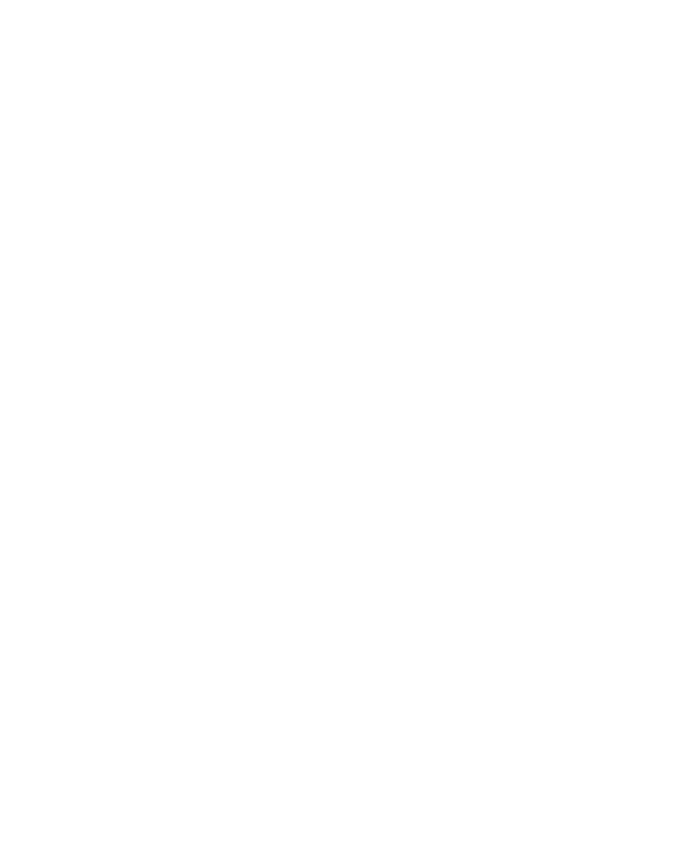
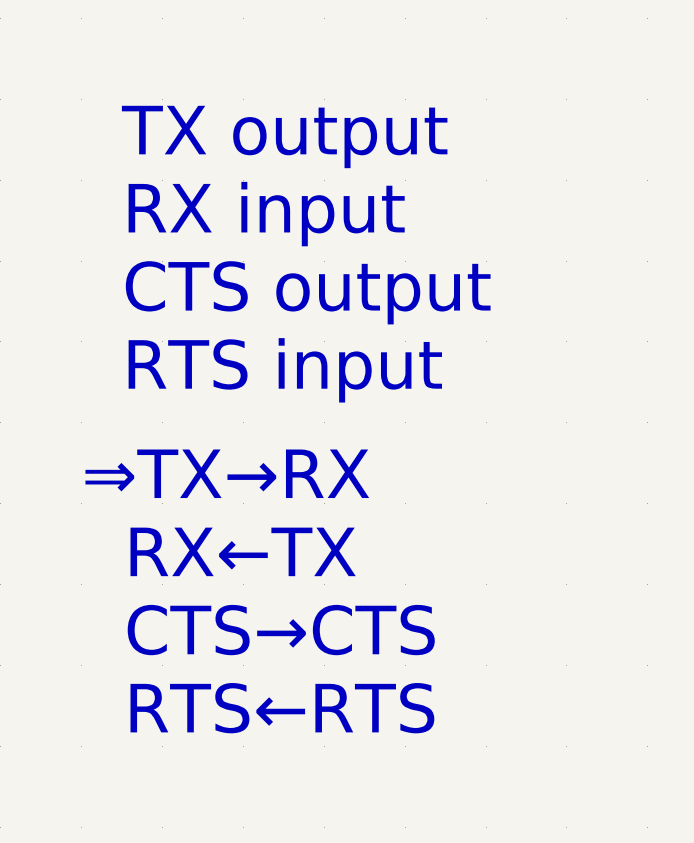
text: none -> TX output (284, 136)
text: none -> RX input (266, 214)
text: none -> CTS output (308, 292)
text: none -> RTS input (285, 370)
text: none -> ⇒TX→RX (227, 473)
text: none -> RX←TX (243, 551)
text: none -> CTS→CTS (281, 630)
text: none -> RTS←RTS (282, 708)

